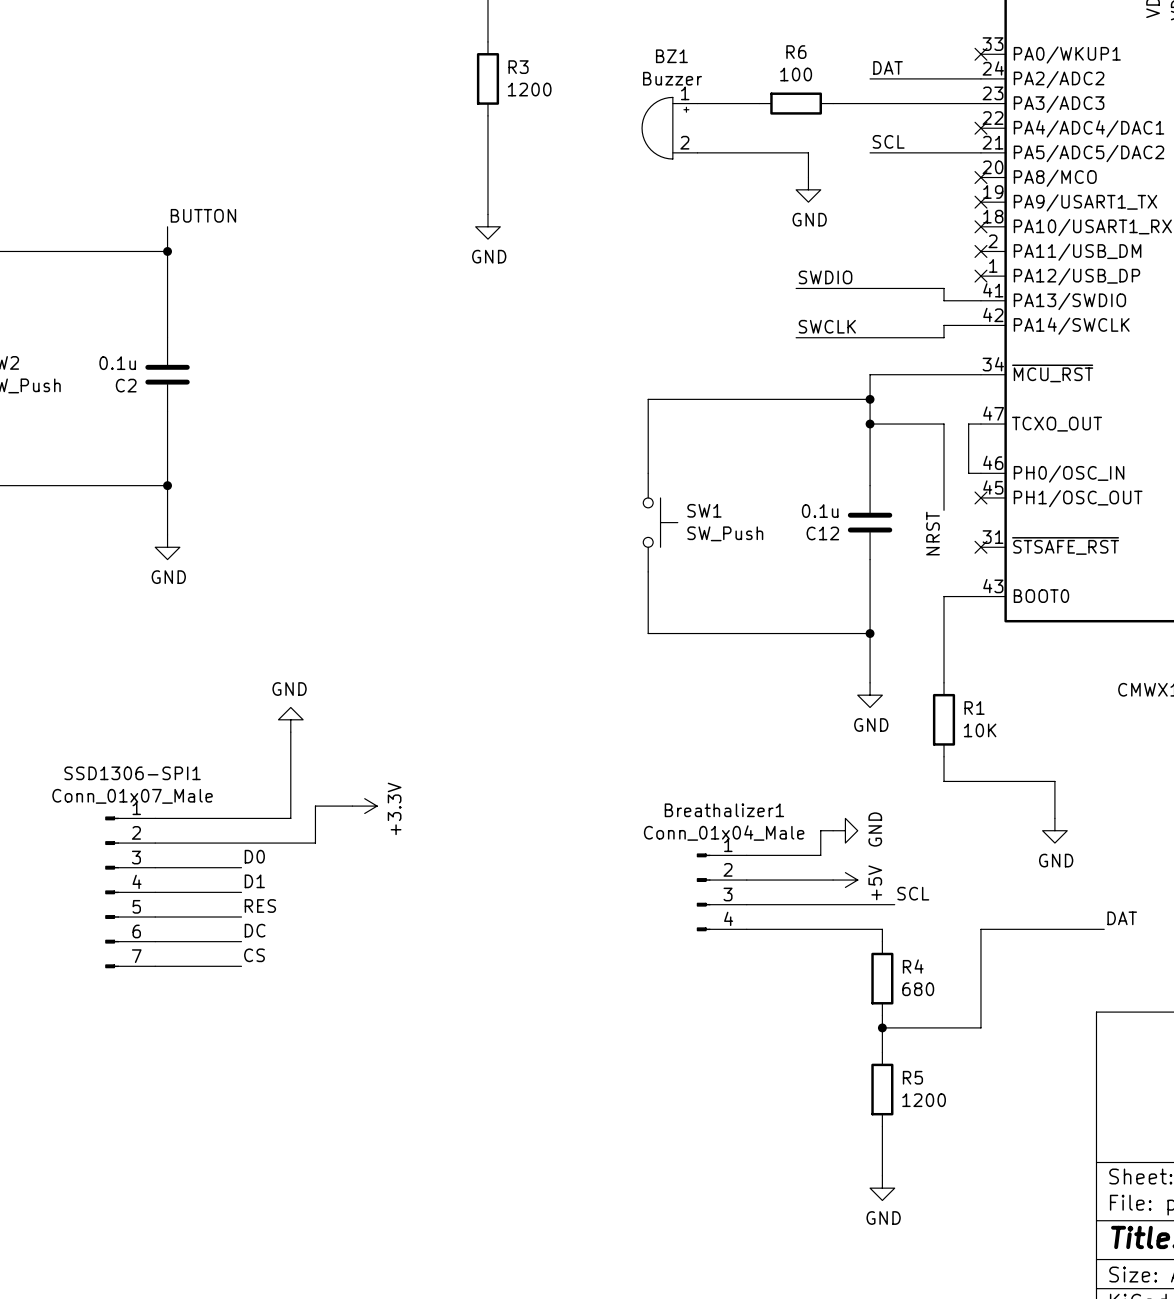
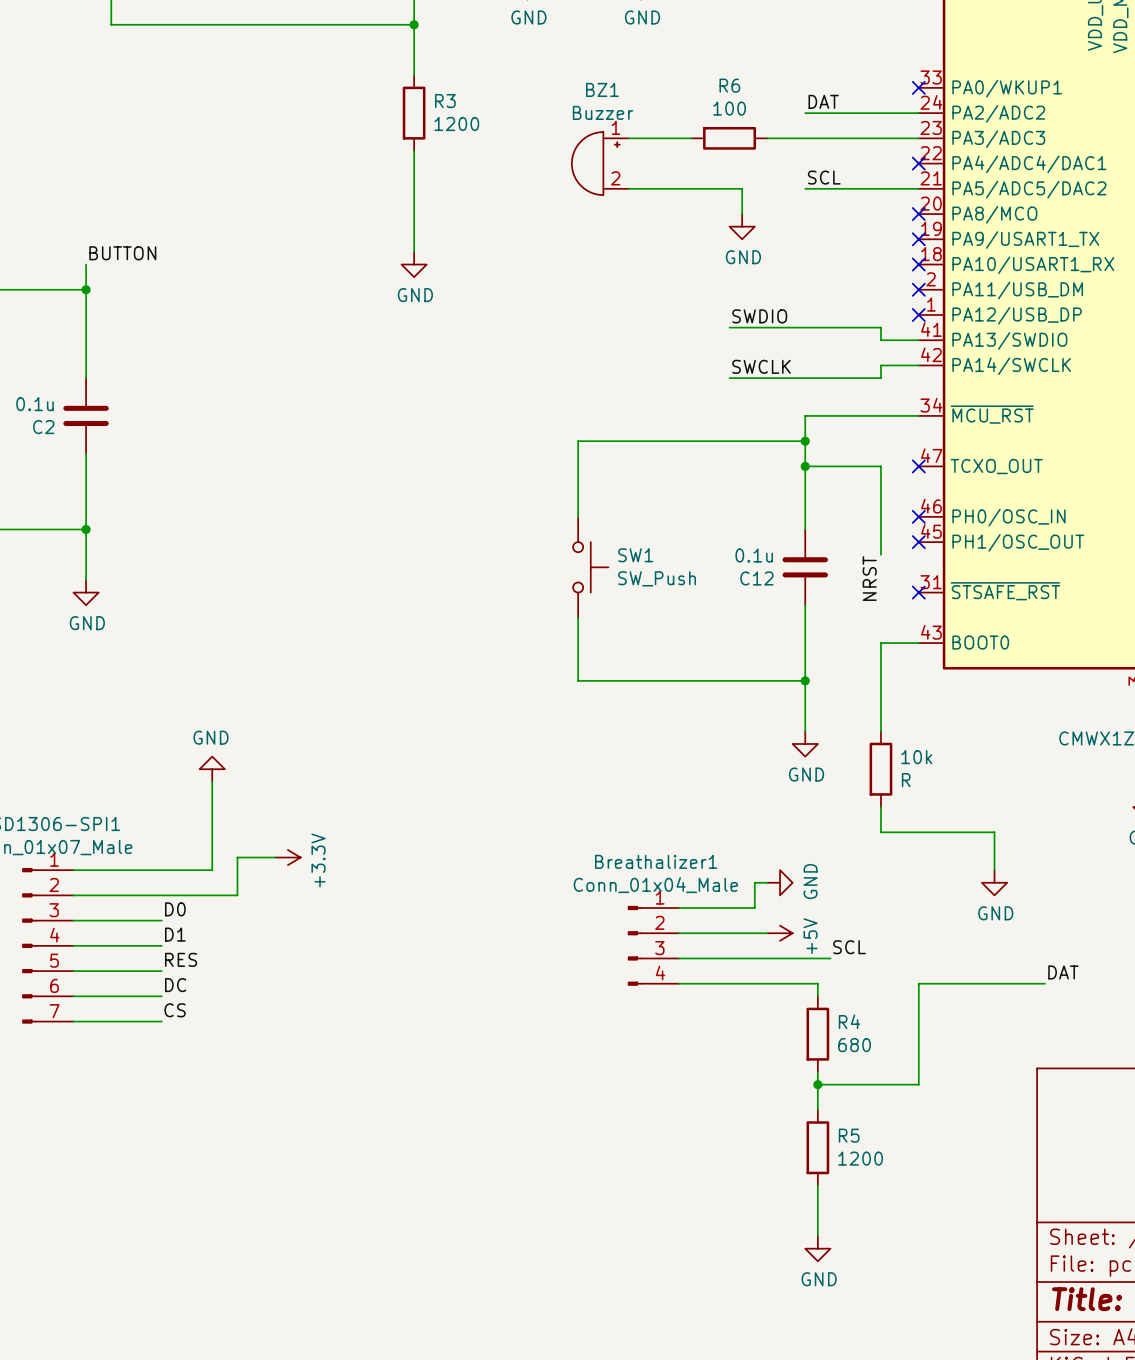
wire: (980, 424) (968, 424) (968, 473) (980, 473) -> none
no-connect mark: none -> (918, 466)
no-connect mark: none -> (918, 516)
R1 name: R1 (974, 708) -> 10k (916, 757)
R1 value: 10K (980, 730) -> R (906, 780)

